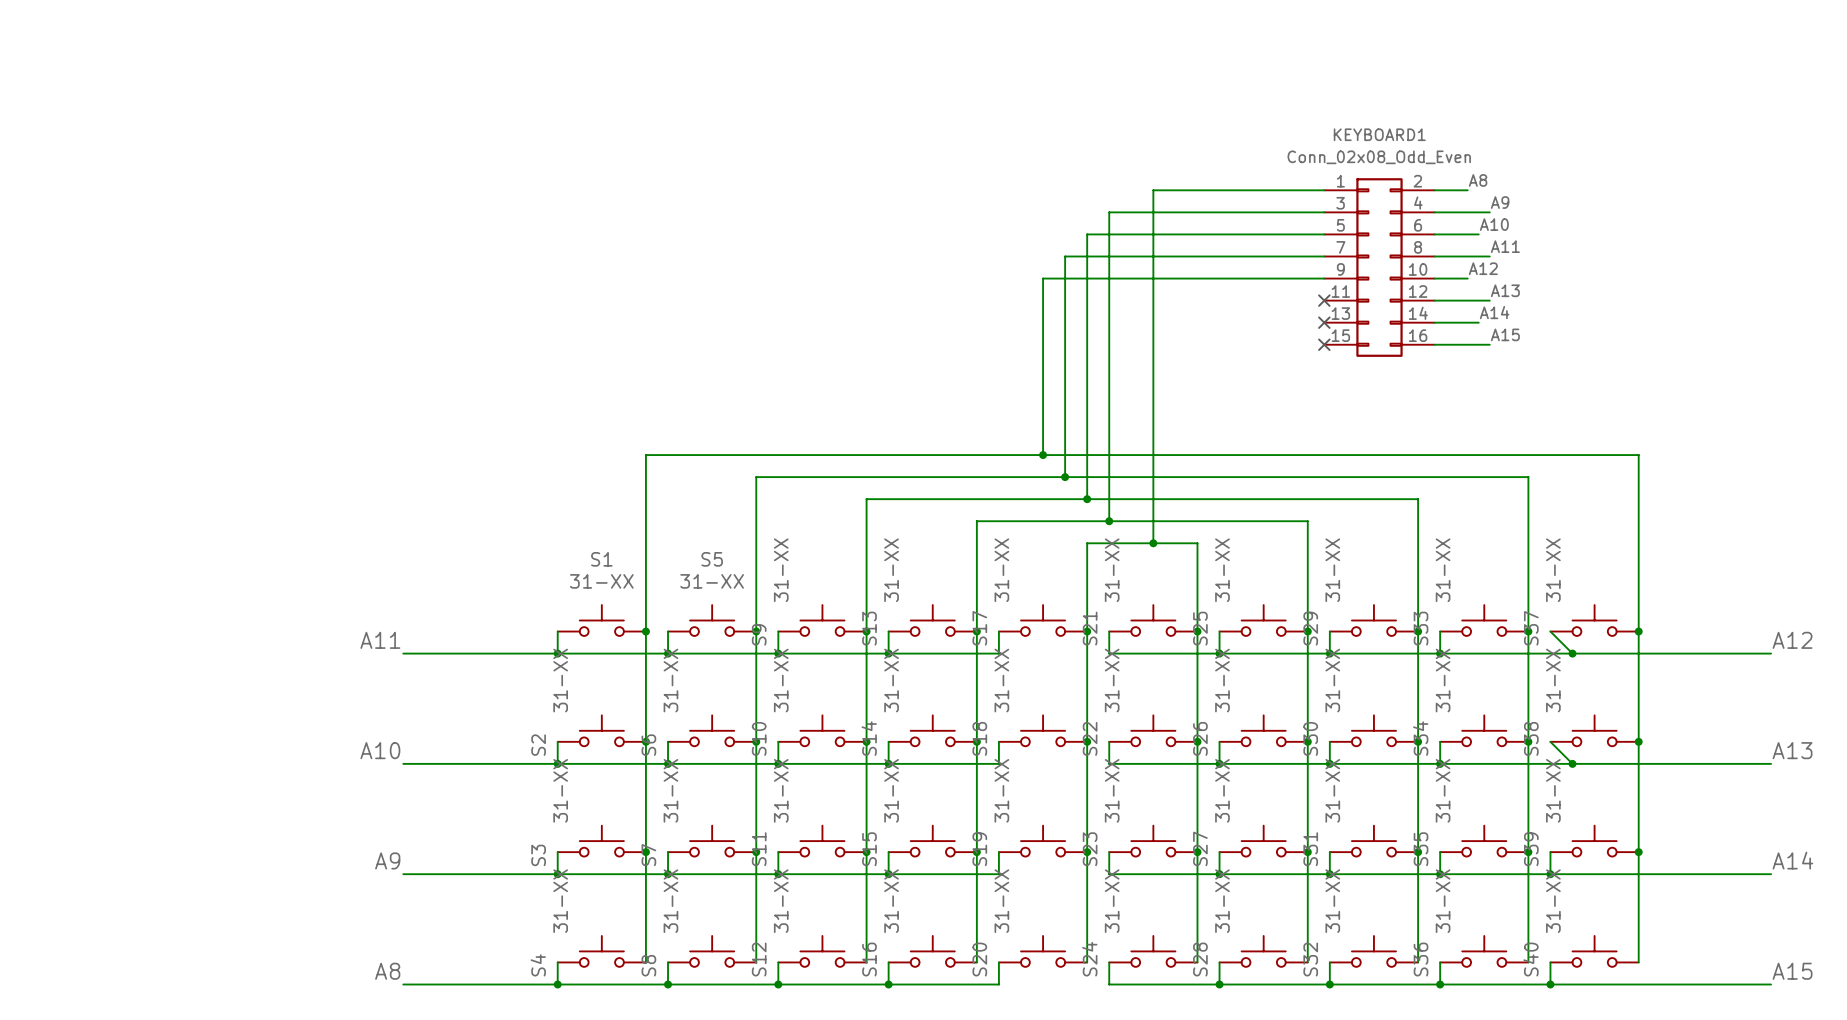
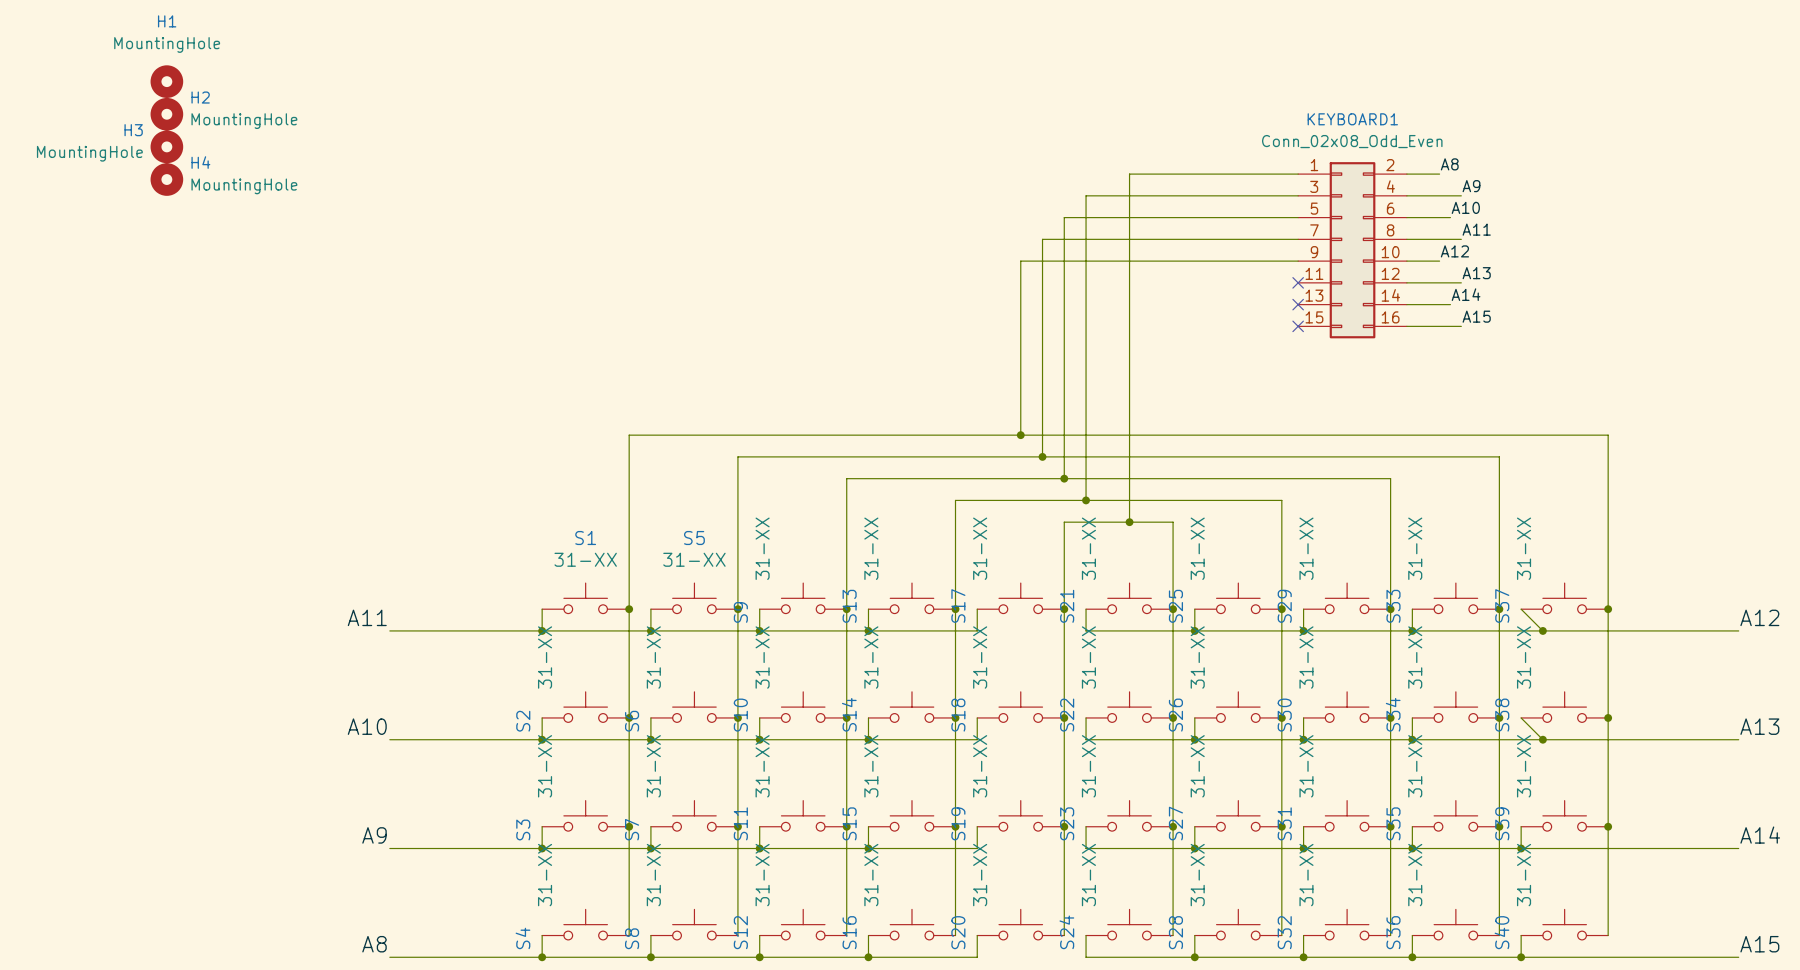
H1: none -> MountingHole (166, 81)
H2: none -> MountingHole (166, 114)
H3: none -> MountingHole (166, 146)
H4: none -> MountingHole (166, 179)

